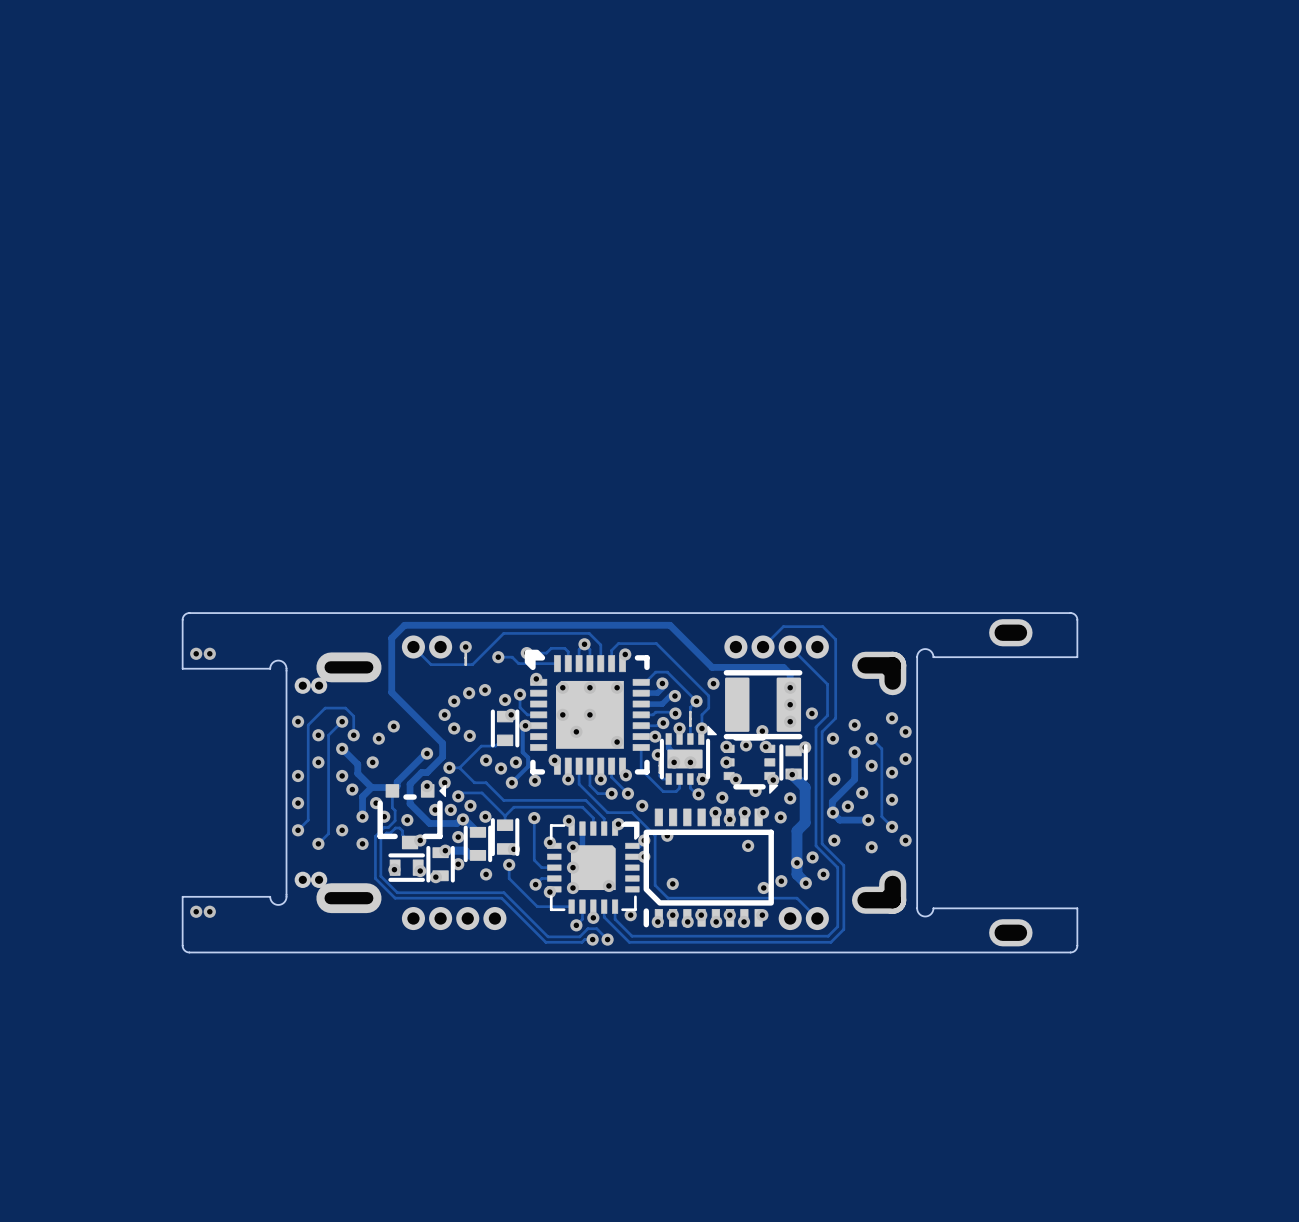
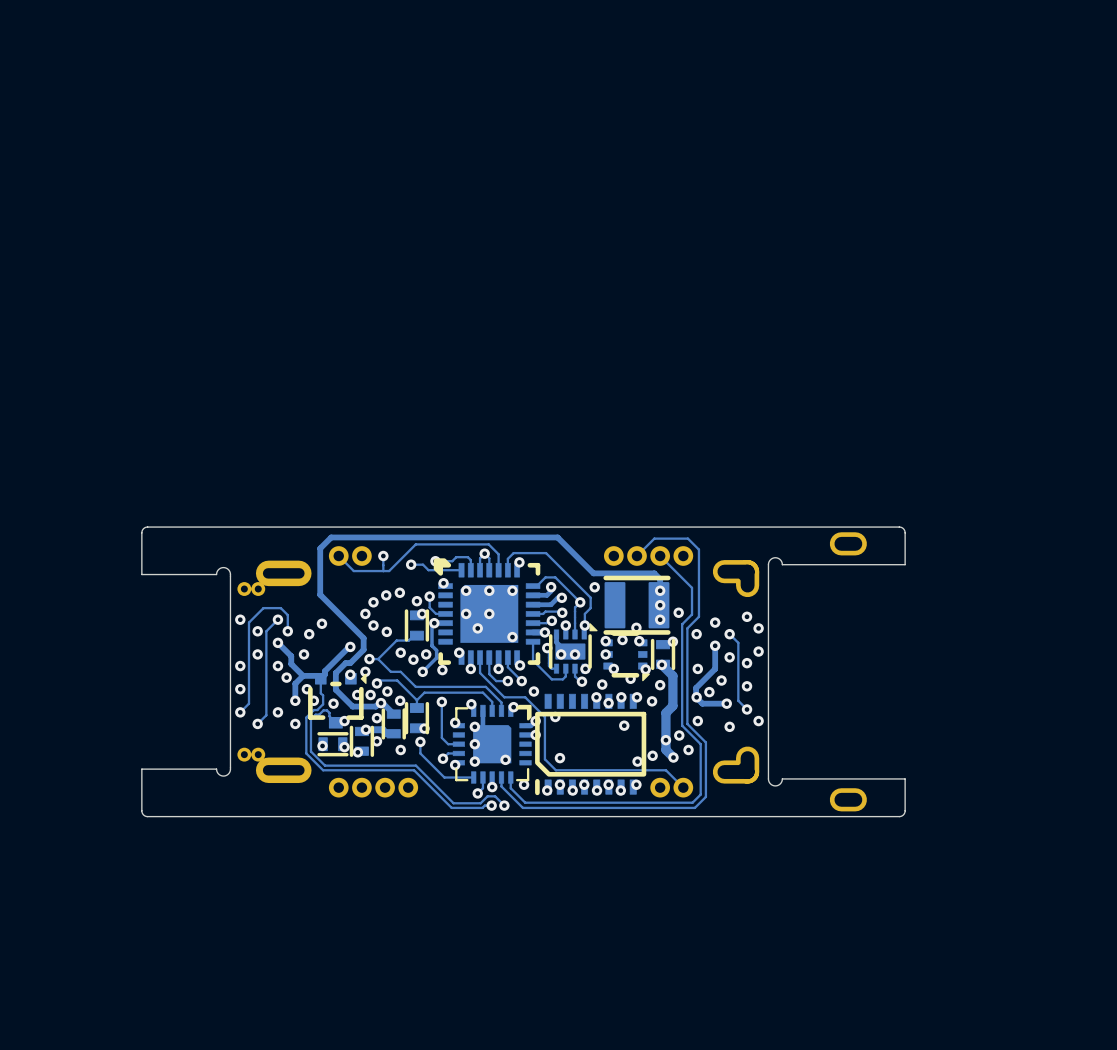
via: (196, 653) -> none
via: (209, 653) -> none
via: (196, 911) -> none
via: (209, 911) -> none

